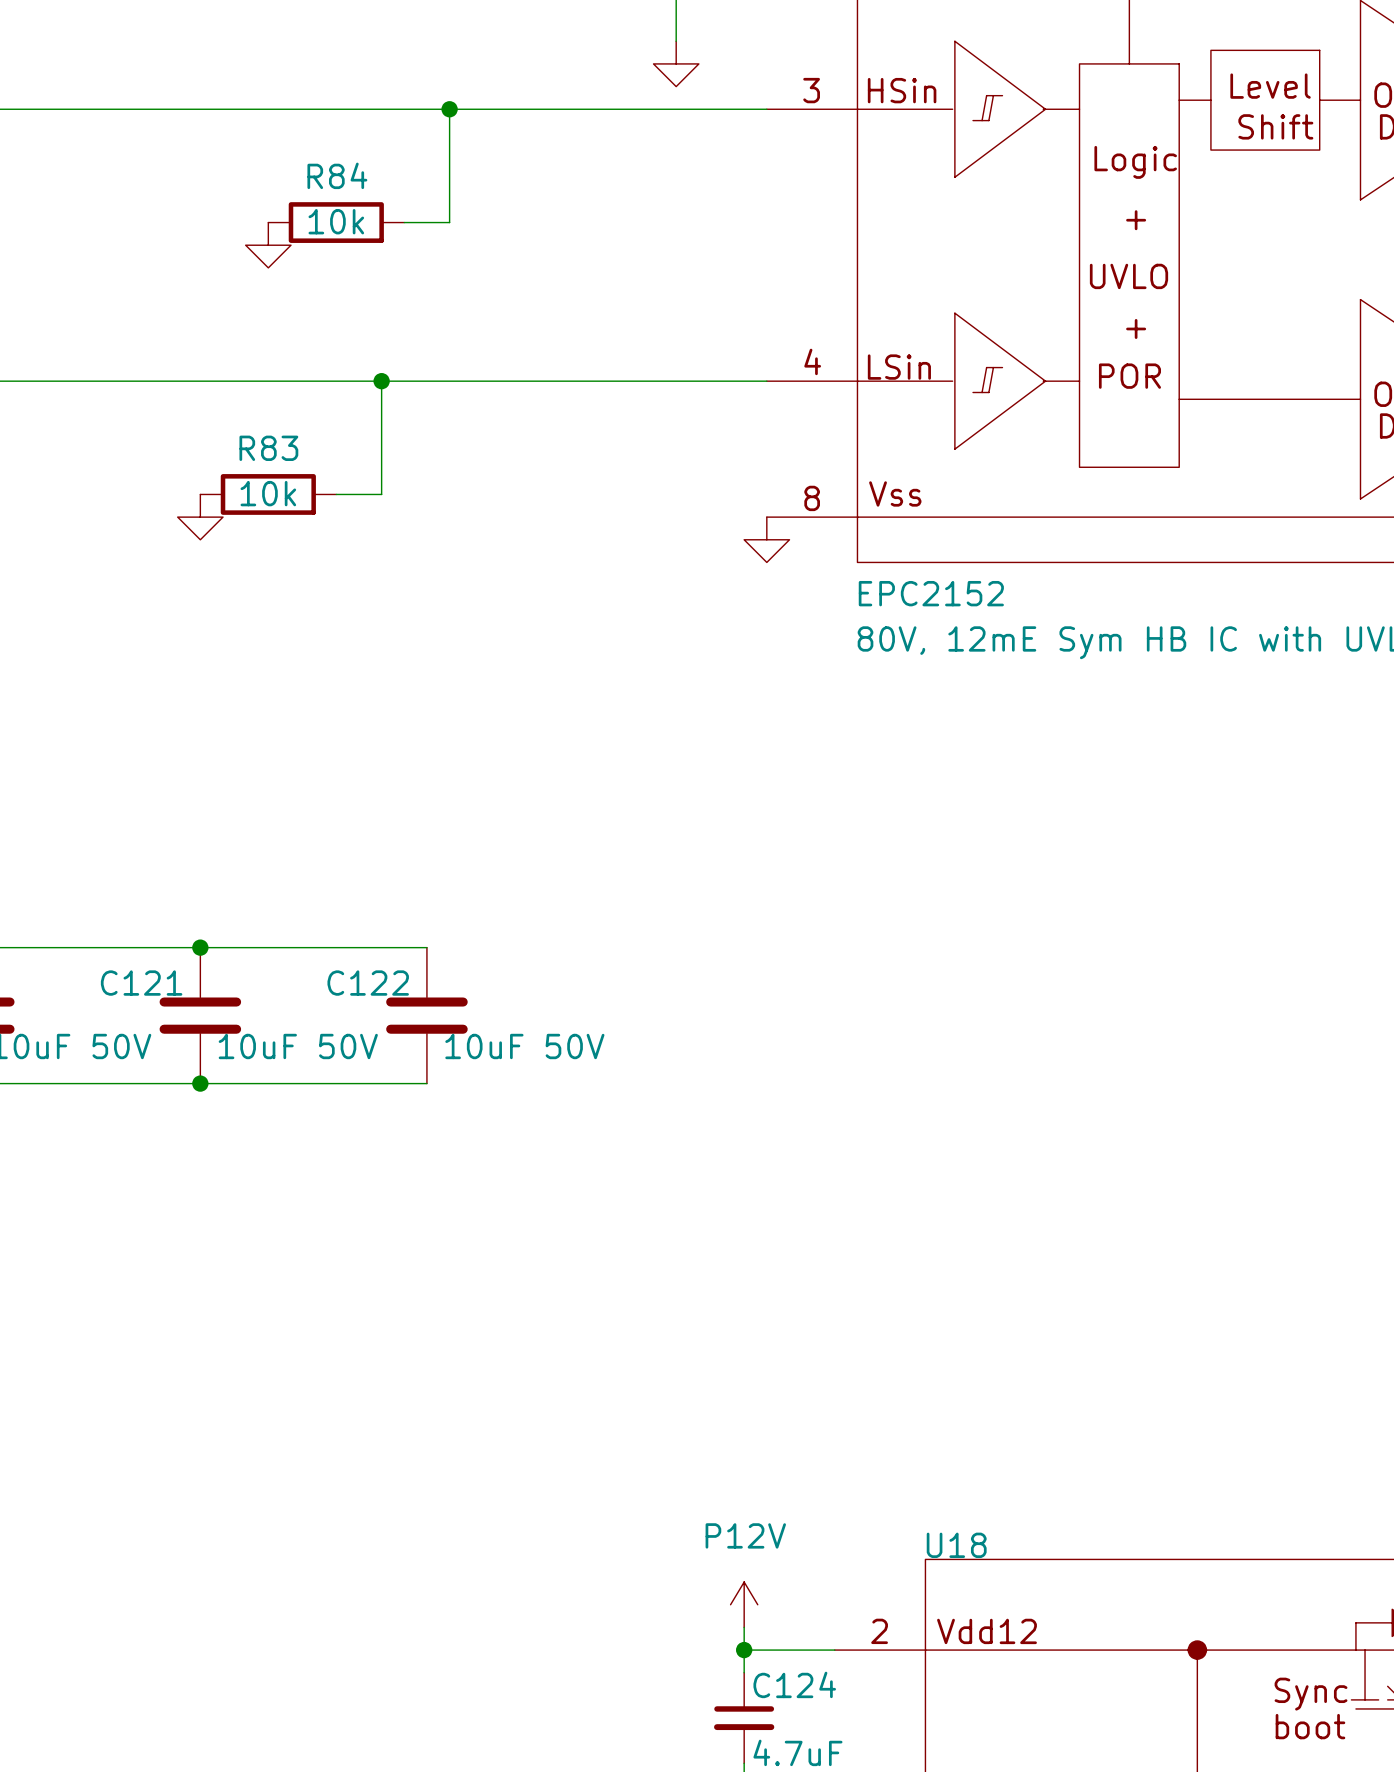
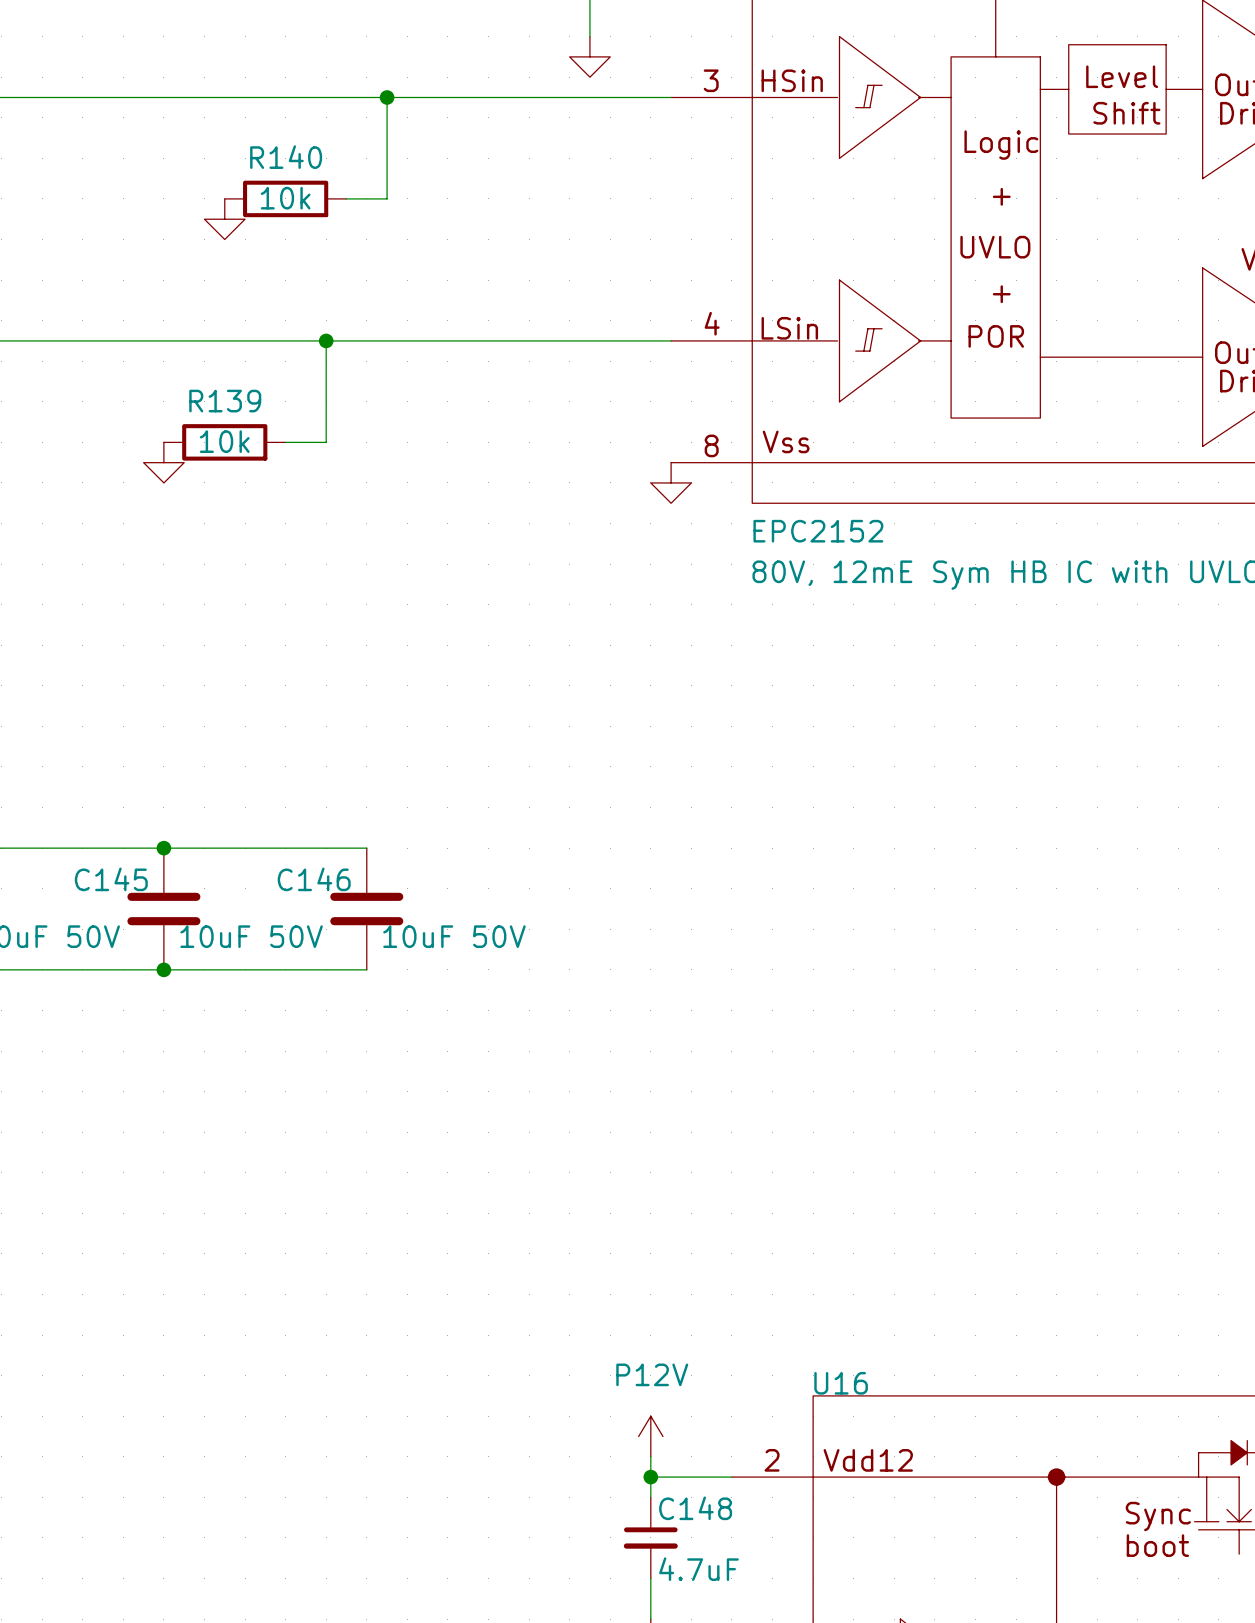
R84 name: R84 (337, 175) -> R140 (286, 157)
R83 name: R83 (268, 448) -> R139 (225, 401)
C121 name: C121 (141, 983) -> C145 (111, 879)
C122 name: C122 (368, 983) -> C146 (314, 879)
U18 name: U18 (956, 1545) -> U16 (841, 1383)
C124 name: C124 (794, 1684) -> C148 (695, 1508)

